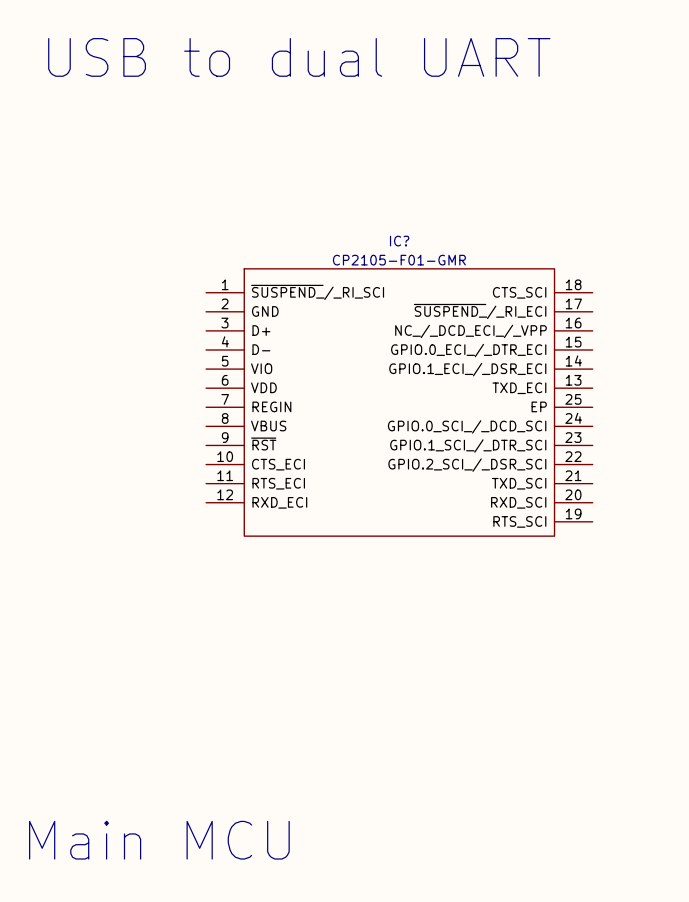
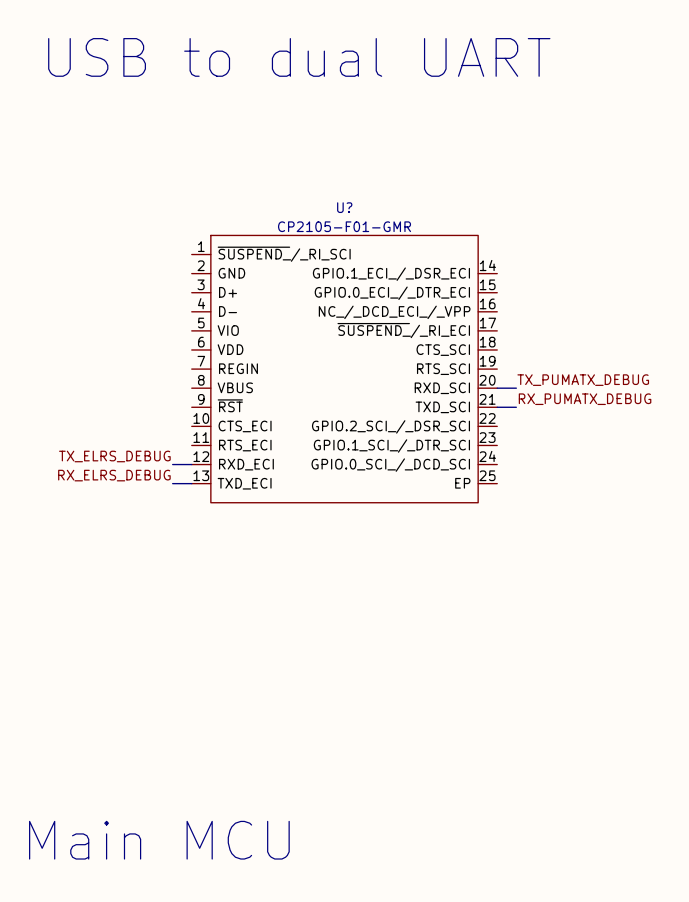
U?: none -> CP2105-F01-GMR (344, 369)
label: none -> TX_PUMATX_DEBUG (583, 380)
wire: none -> (497, 388) (516, 388)
label: none -> RX_PUMATX_DEBUG (585, 399)
IC?: CP2105-F01-GMR (399, 402) -> none
wire: none -> (497, 407) (516, 407)
label: none -> TX_ELRS_DEBUG (114, 456)
wire: none -> (172, 464) (191, 464)
label: none -> RX_ELRS_DEBUG (114, 475)
wire: none -> (172, 483) (191, 483)

